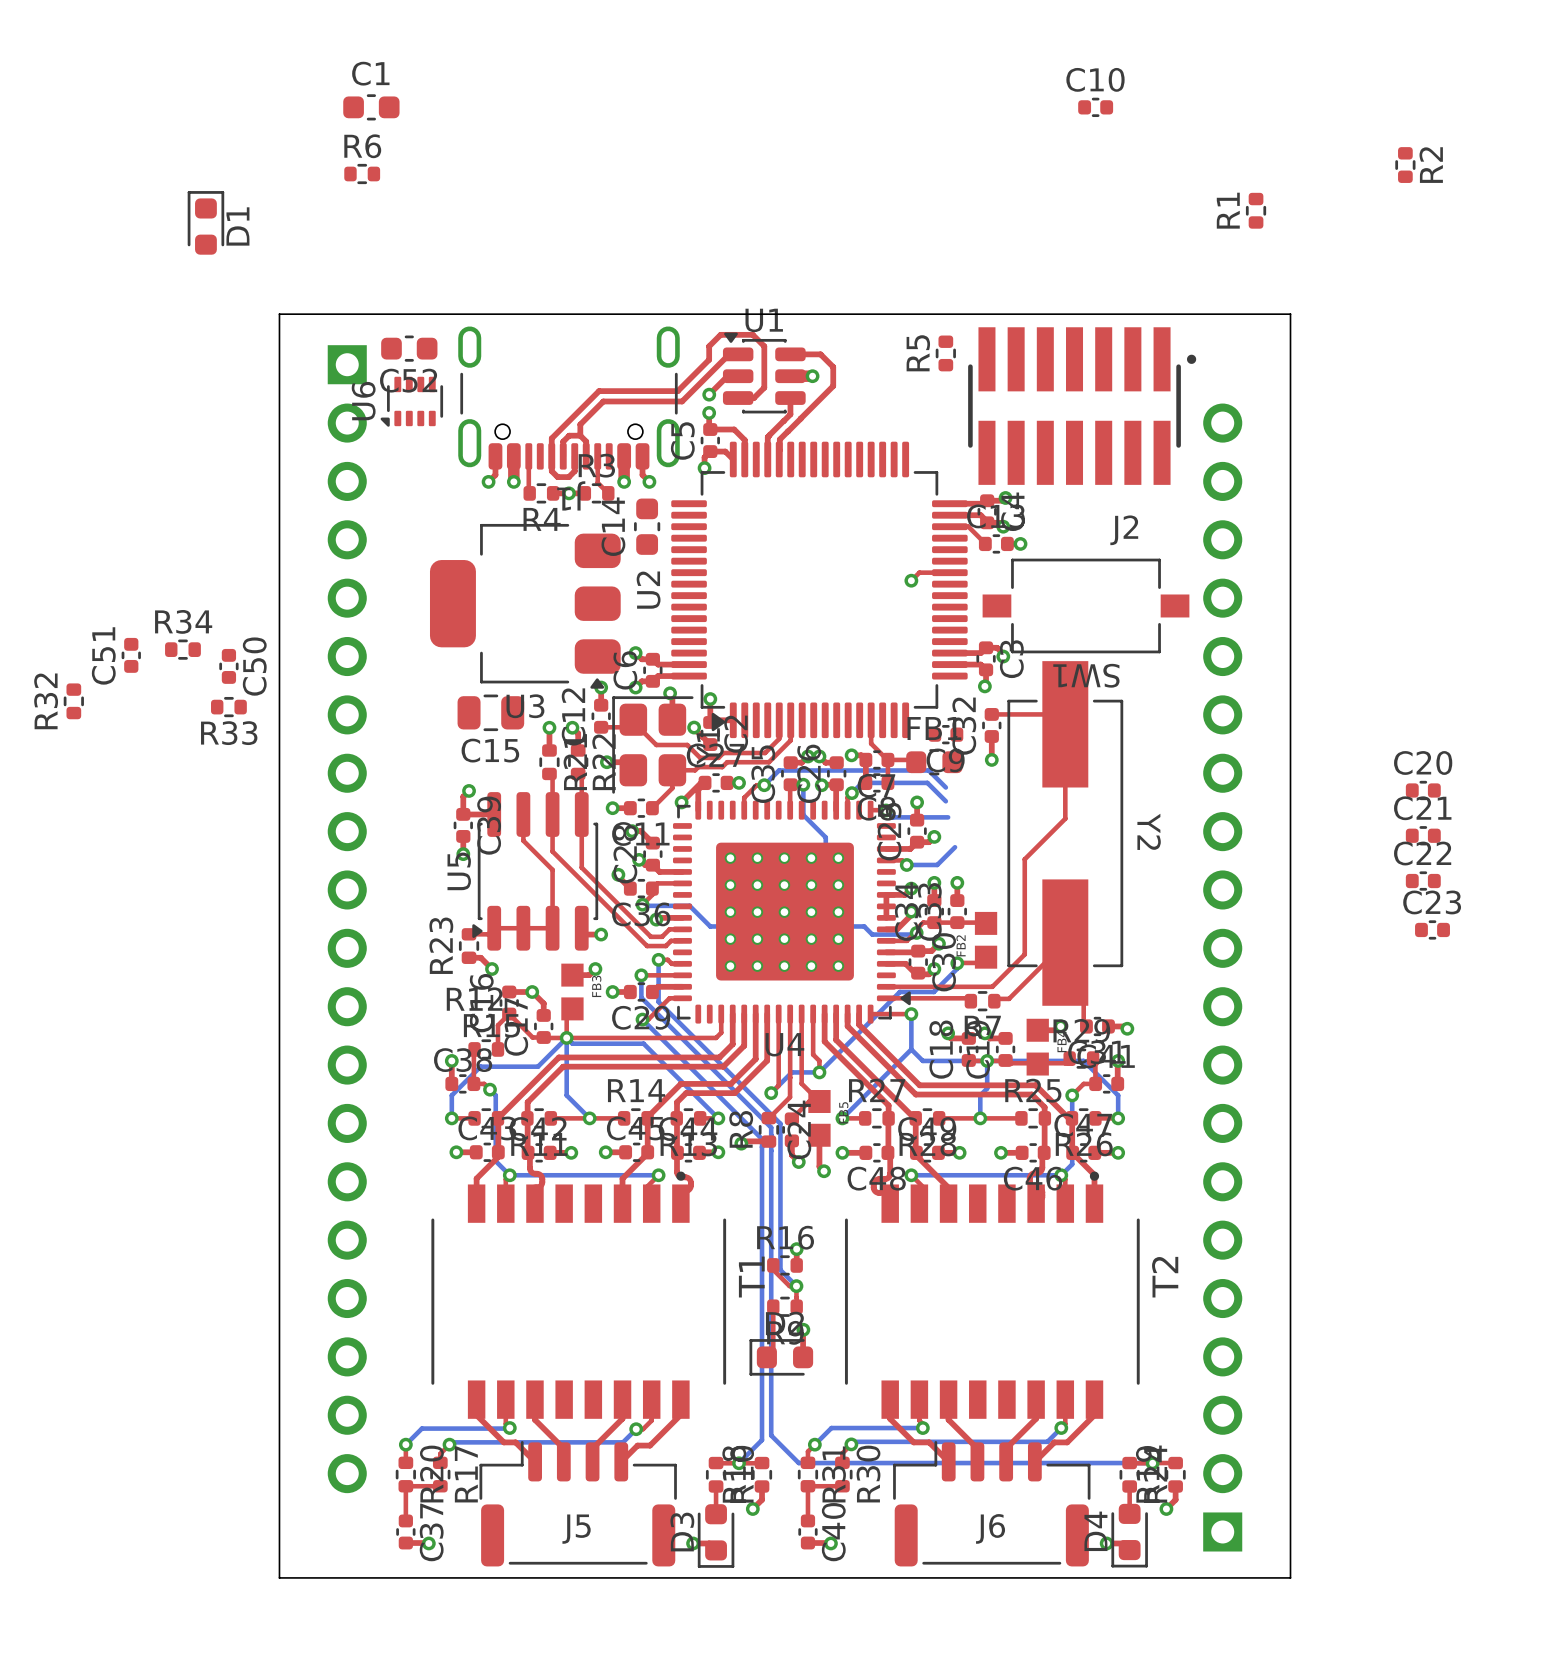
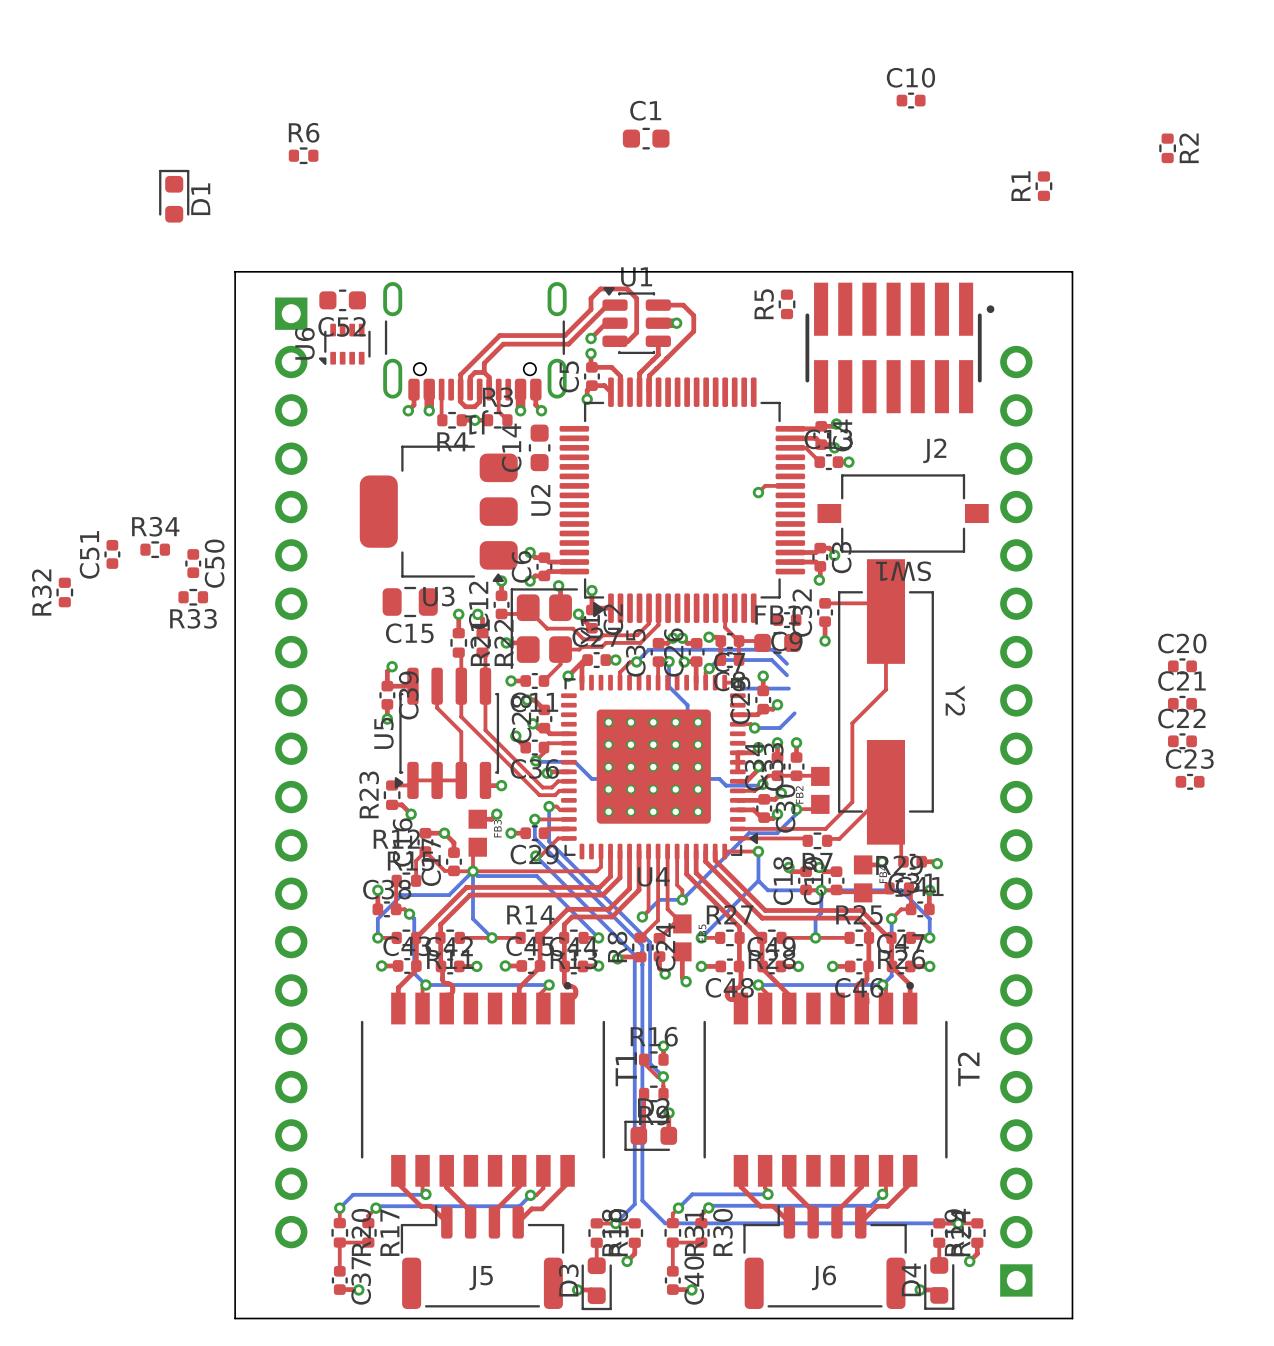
C1 position: (371, 107) -> (646, 138)

